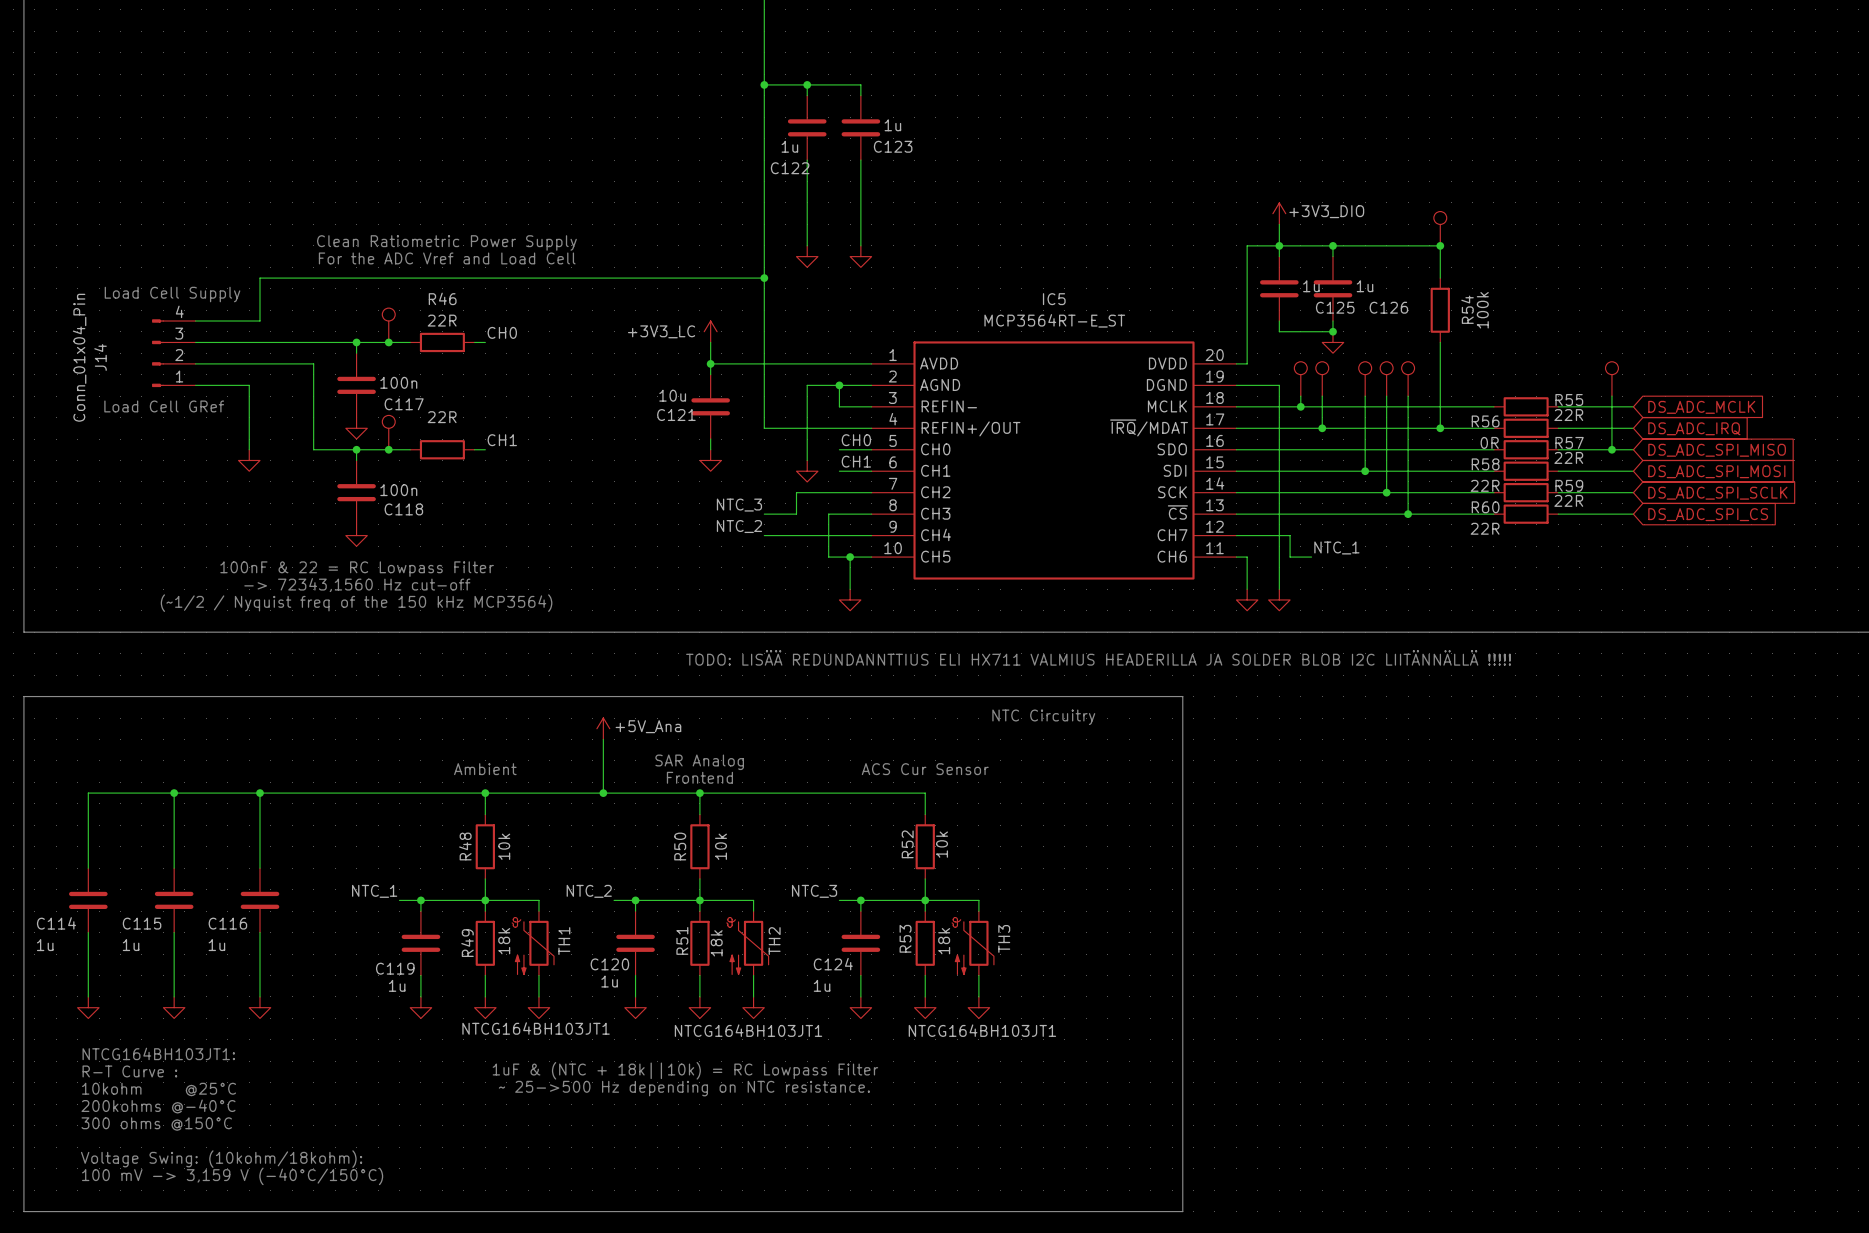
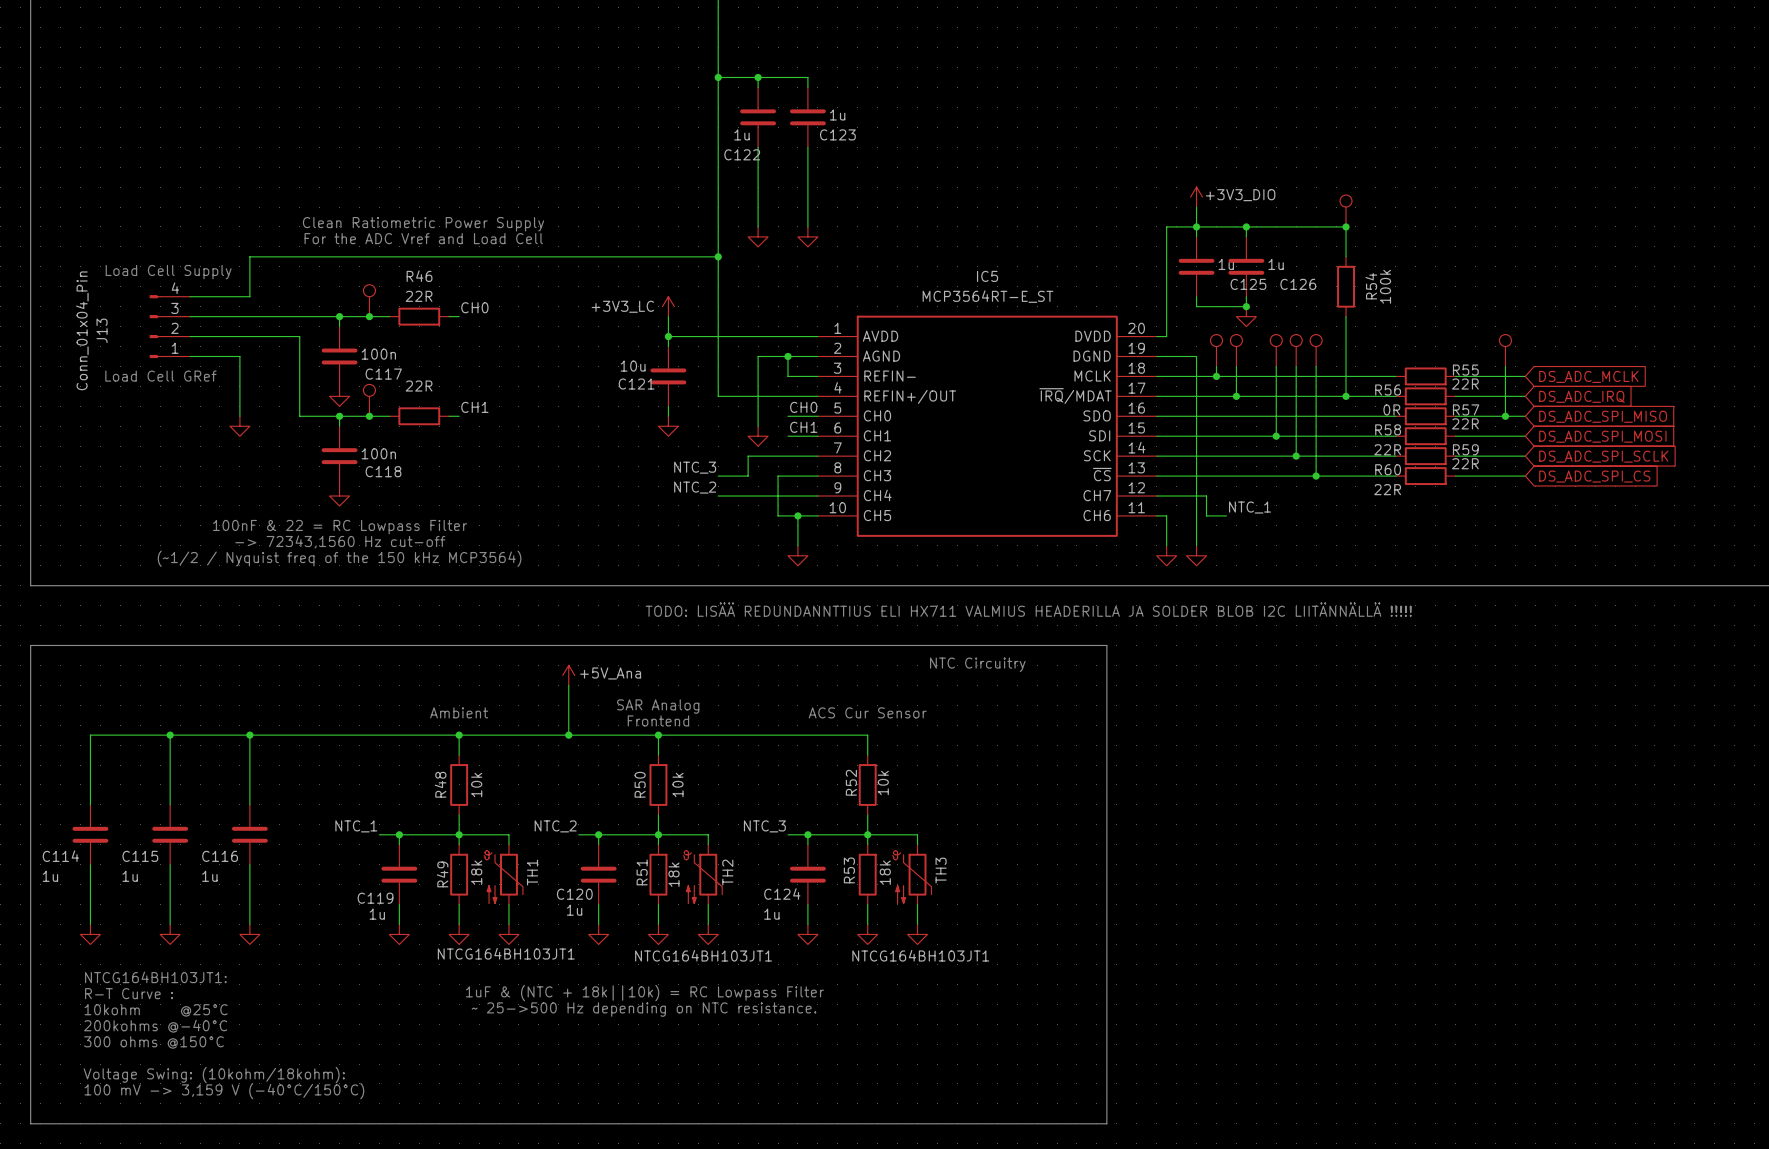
J14 name: J14 (100, 357) -> J13 (102, 330)

